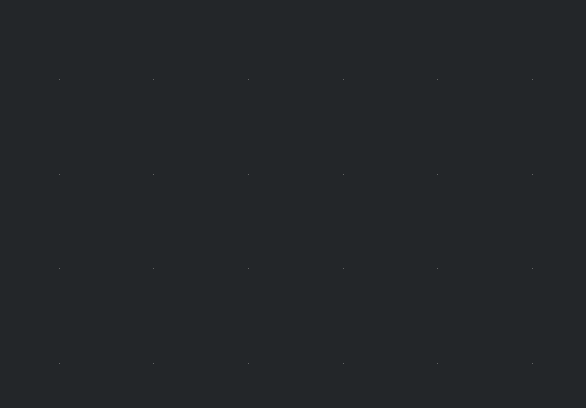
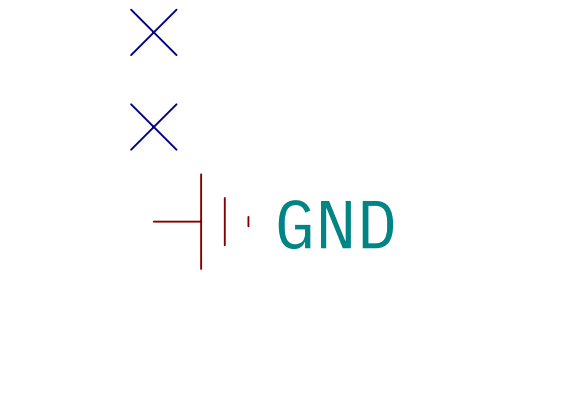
no-connect mark: none -> (153, 32)
no-connect mark: none -> (153, 127)
power symbol: none -> GND (201, 221)

